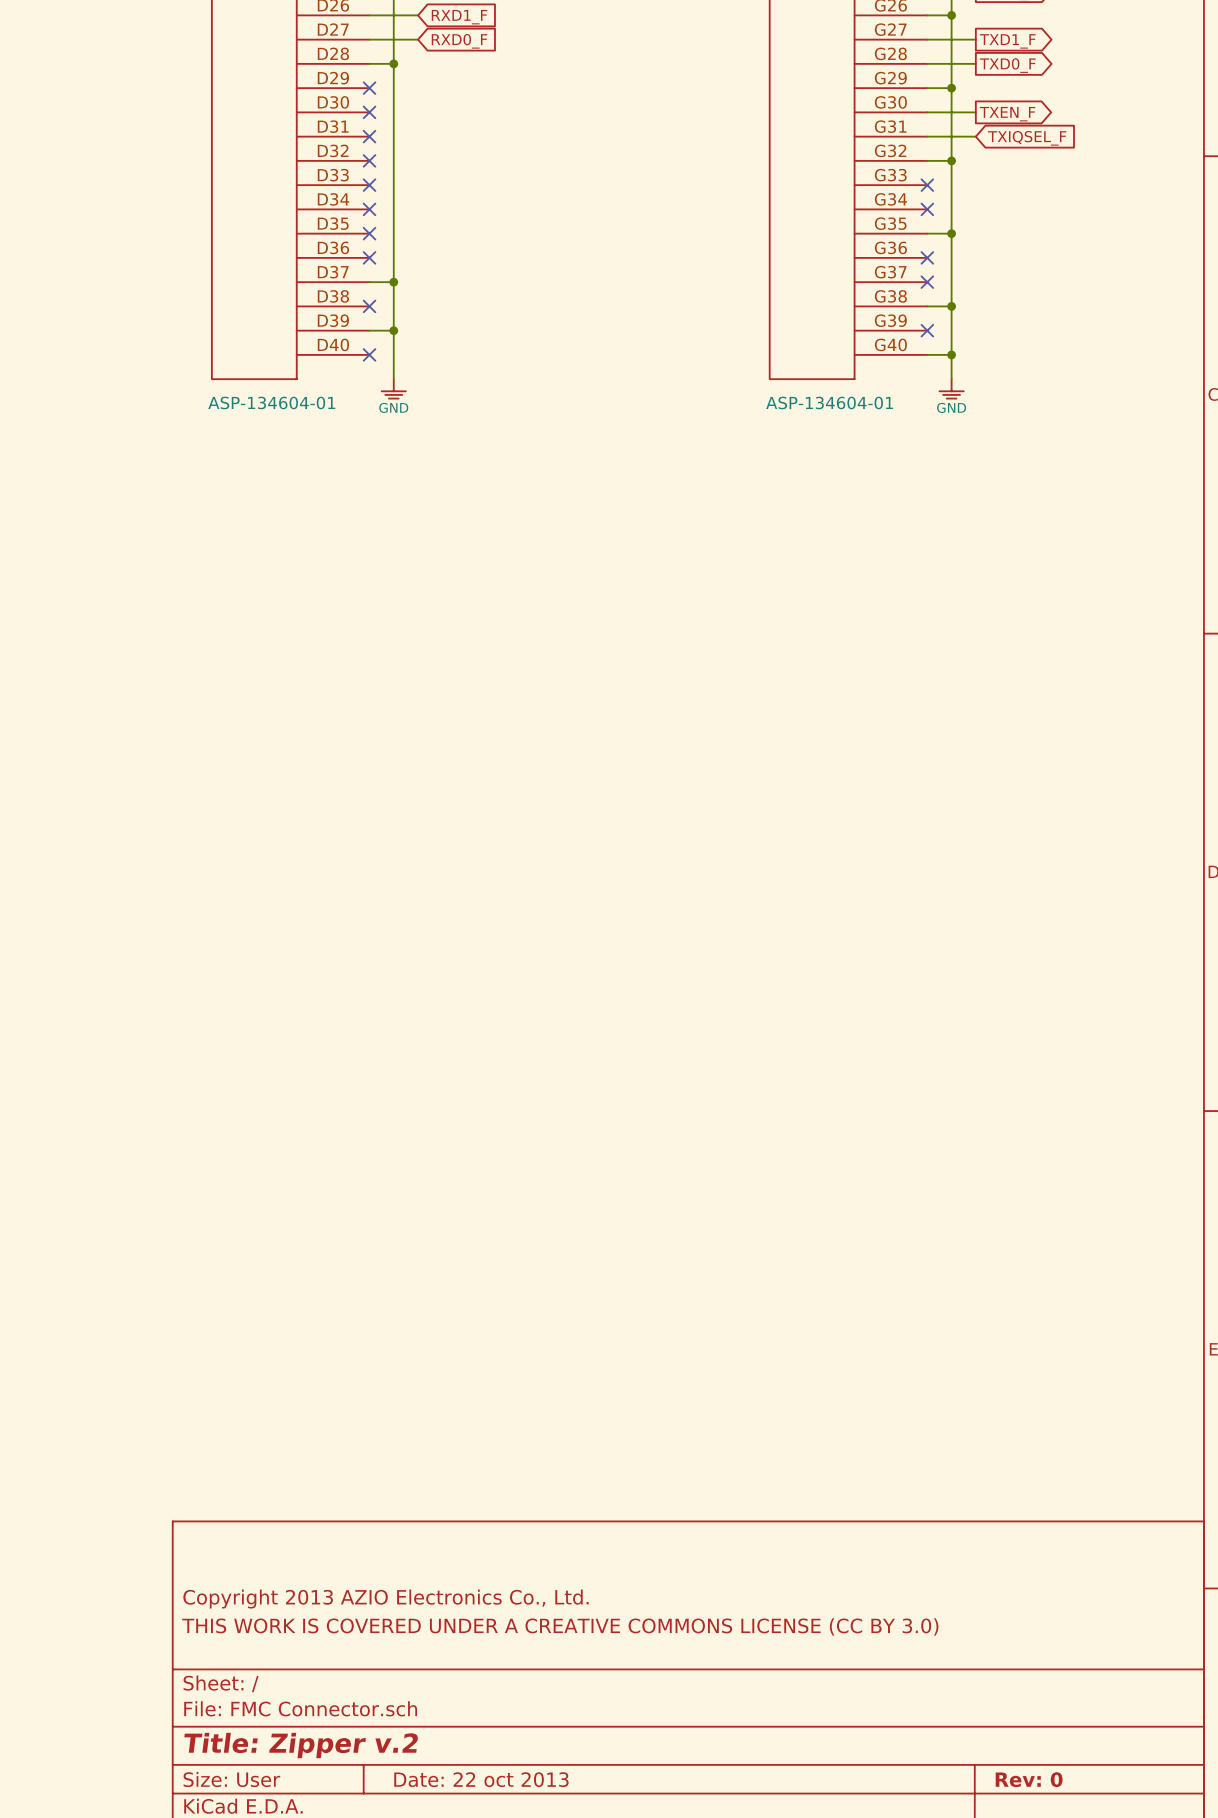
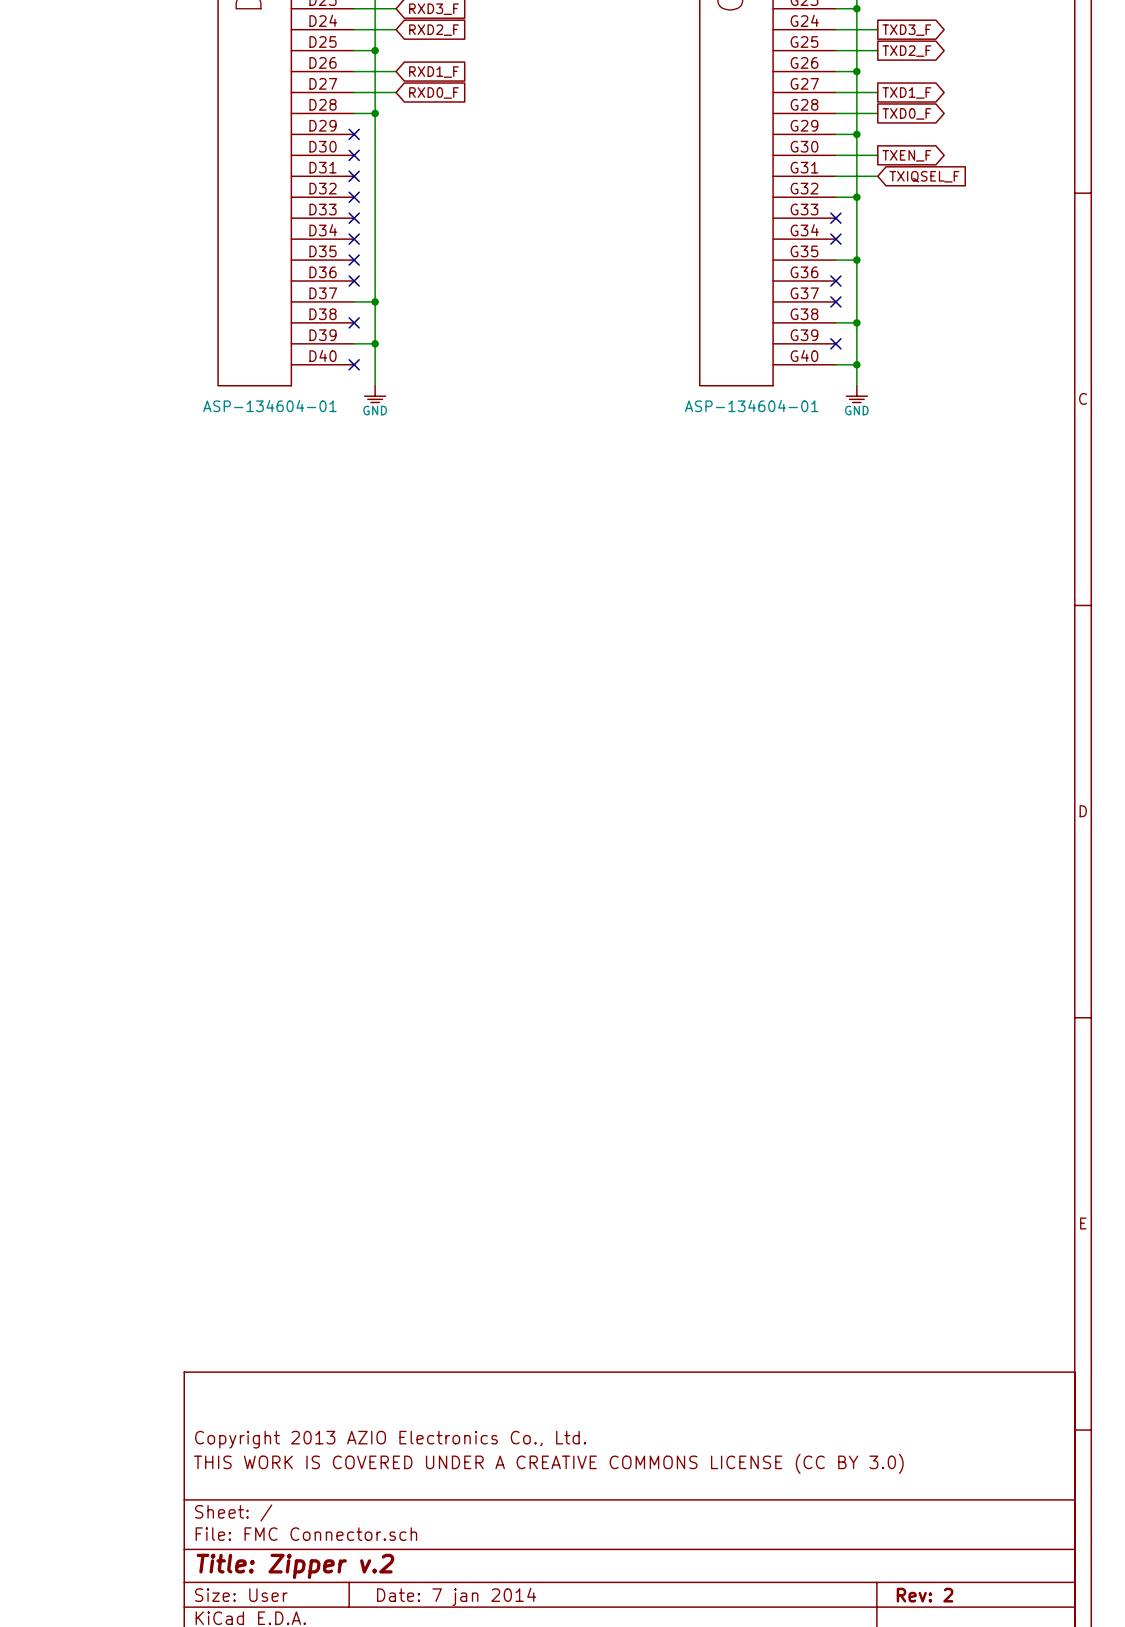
title block: Date: 22 oct 2013 (481, 1779) -> Date: 7 jan 2014 (456, 1596)
title block: Rev: 0 (1029, 1779) -> Rev: 2 (925, 1595)

